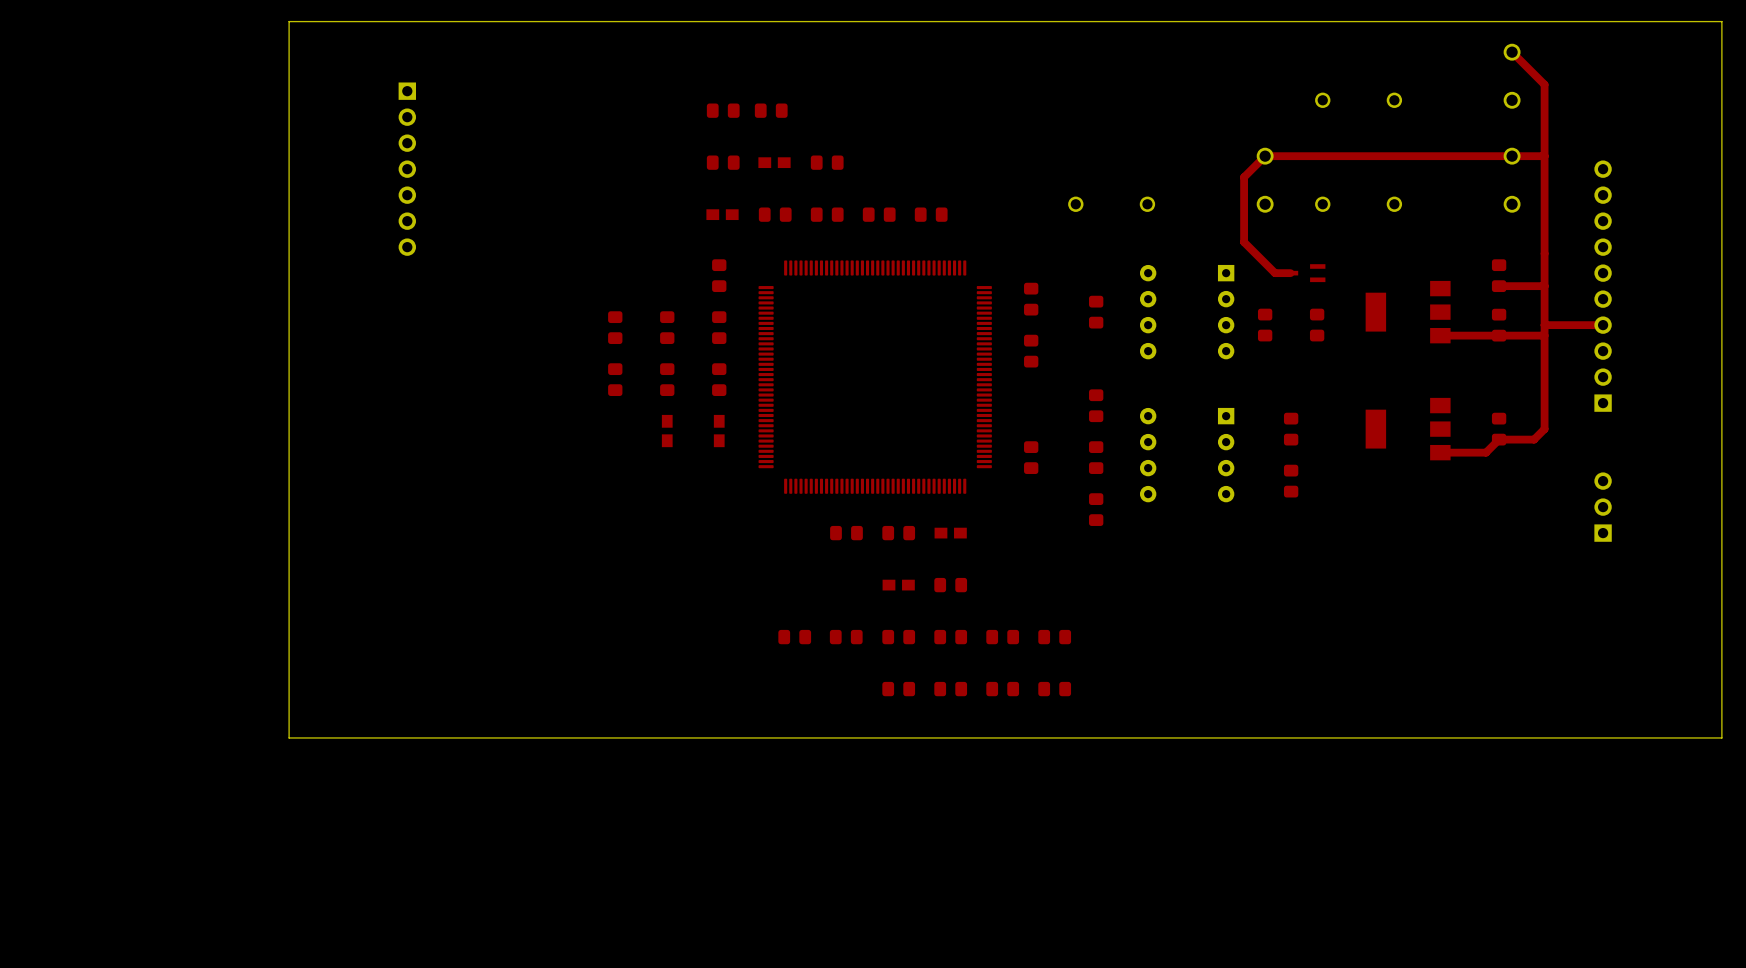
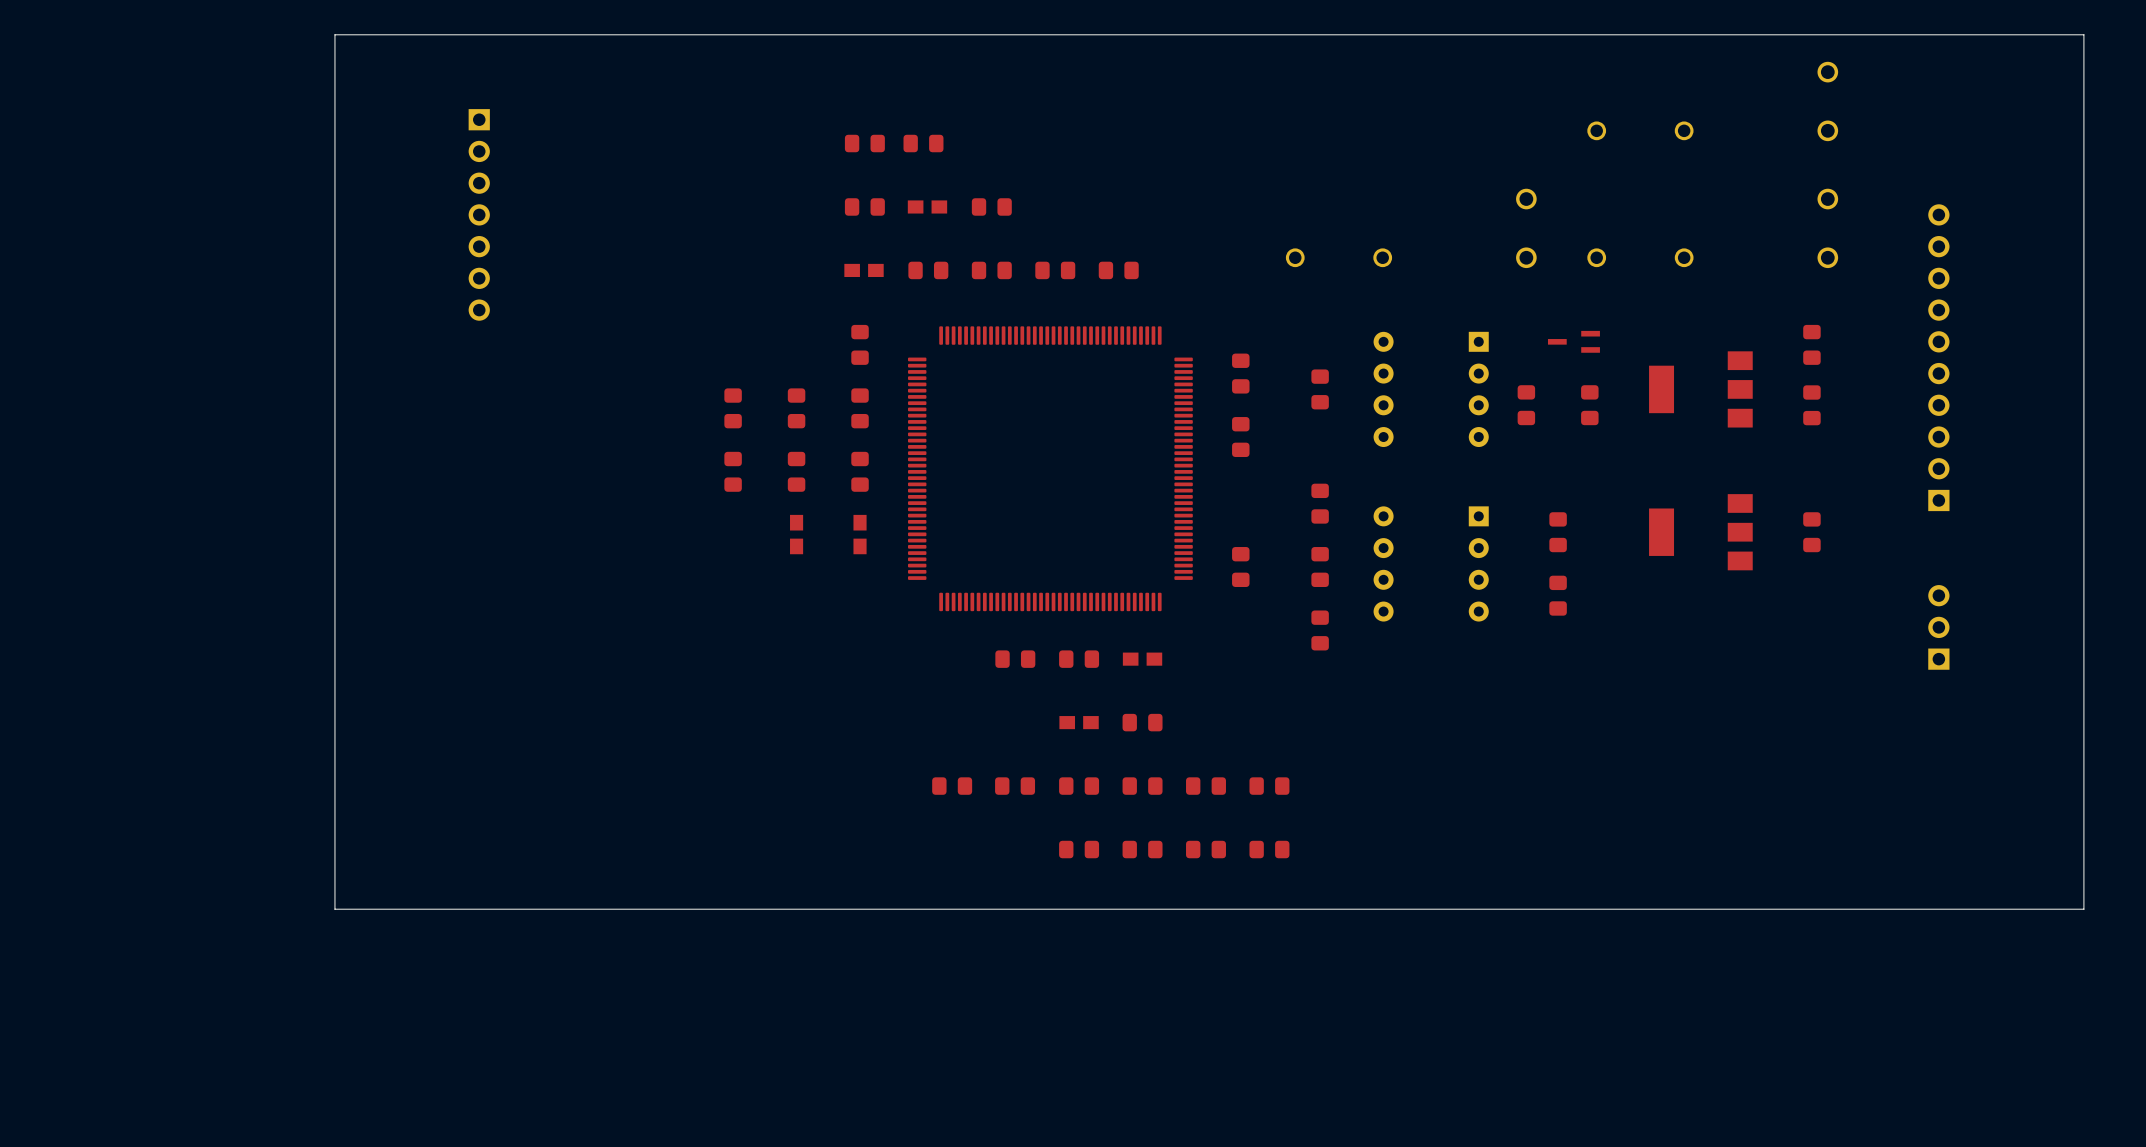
top track: (1512, 52) (1544, 84) (1544, 429) (1534, 439) (1499, 439) (1486, 452) (1440, 452) -> none
top track: (1544, 156) (1265, 156) (1244, 177) (1244, 242) (1275, 273) (1290, 273) -> none
top track: (1544, 286) (1499, 286) -> none
top track: (1603, 325) (1544, 325) -> none
top track: (1544, 335) (1440, 335) -> none

